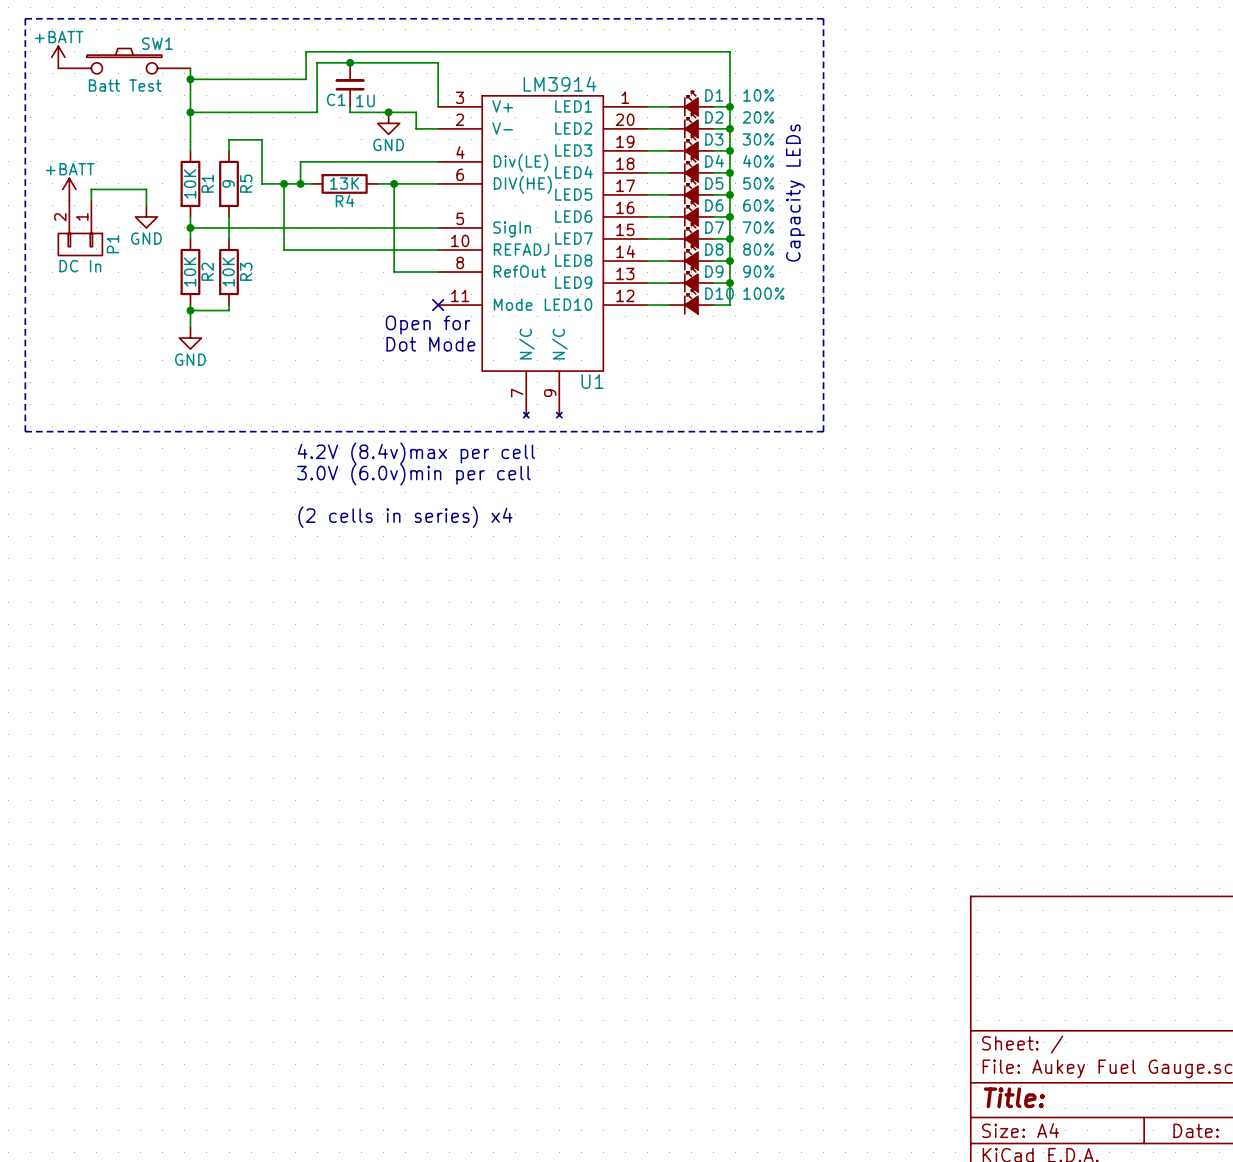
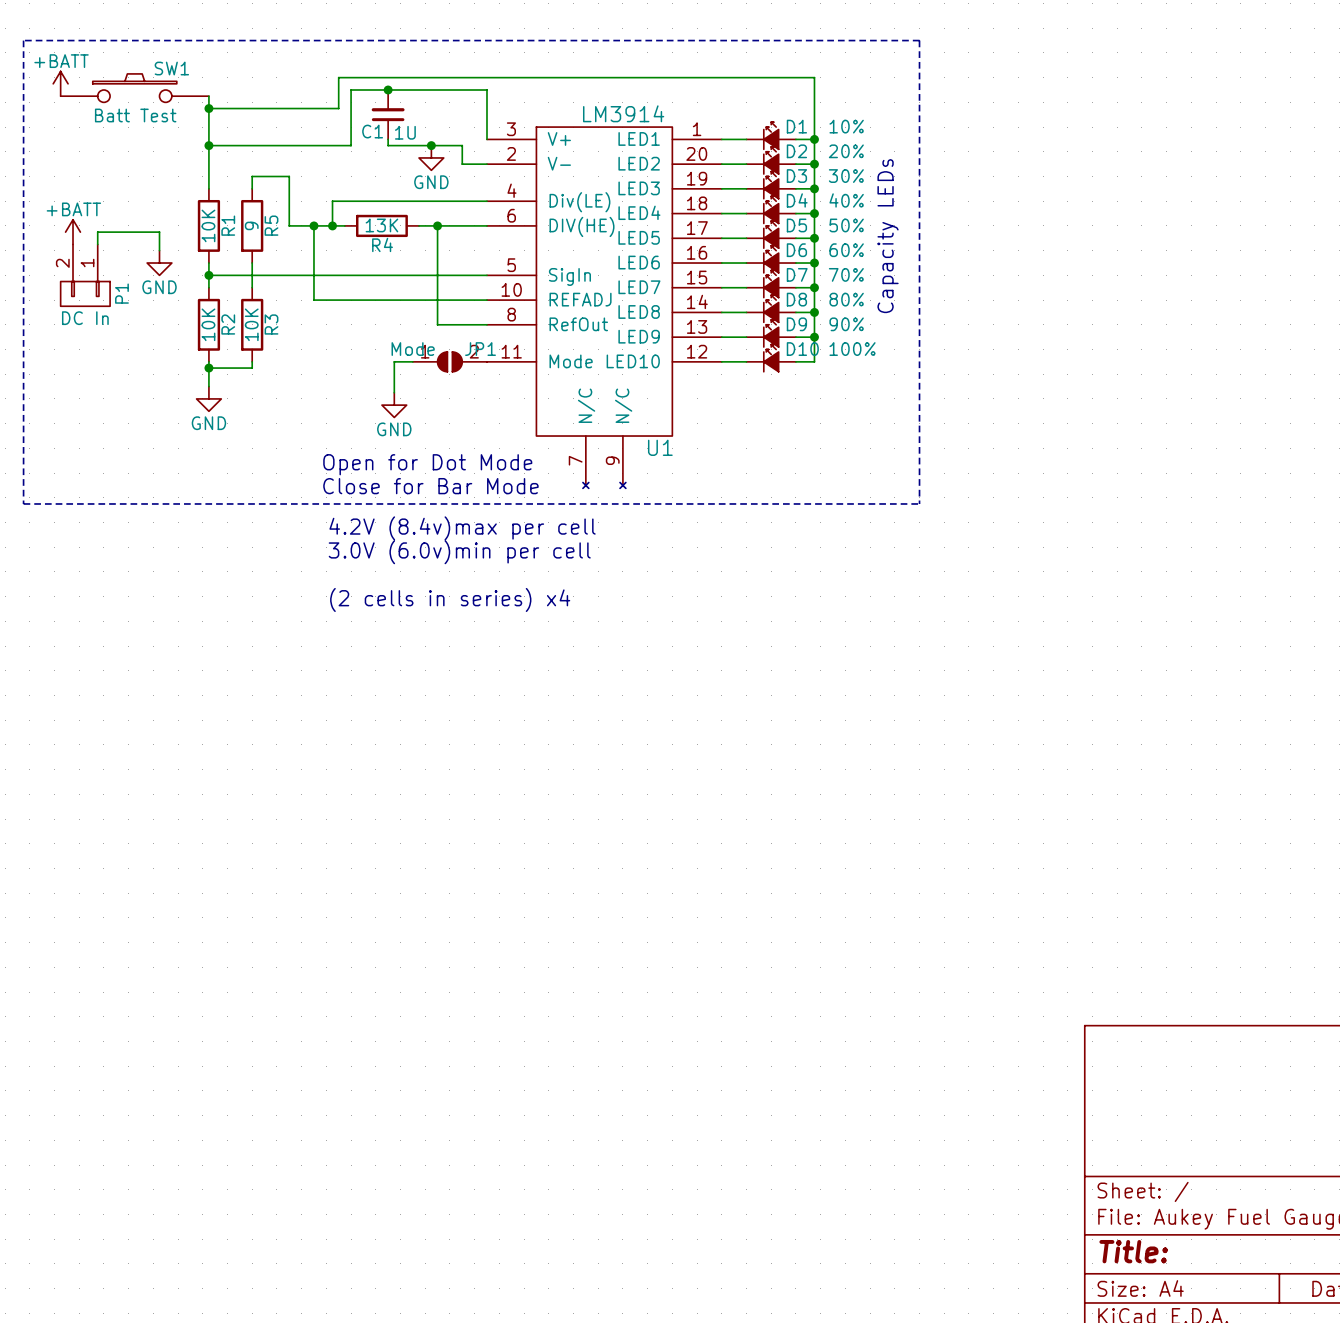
wire: none -> (412, 361) (394, 361) (394, 392)
JP1: none -> Mode (449, 361)
no-connect mark: (438, 305) -> none
text: Open for (428, 325) -> none
power symbol: none -> GND (394, 405)
text: Dot Mode (430, 344) -> none
text: none -> Open for Dot Mode (427, 464)
text: none -> Close for Bar Mode (430, 486)

